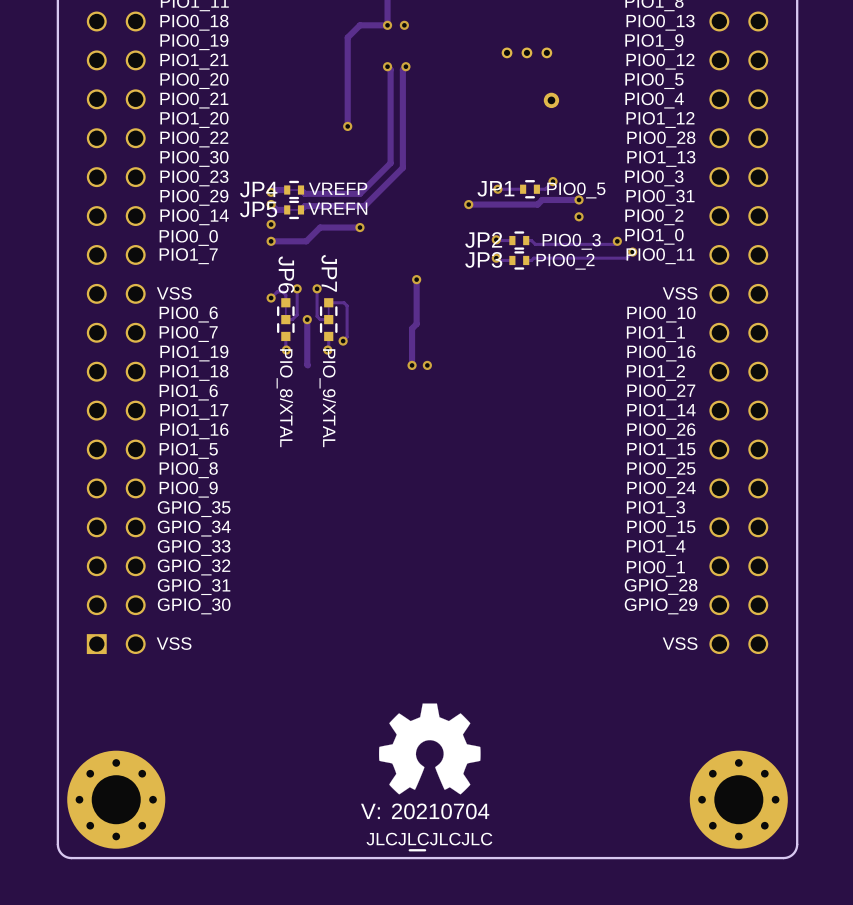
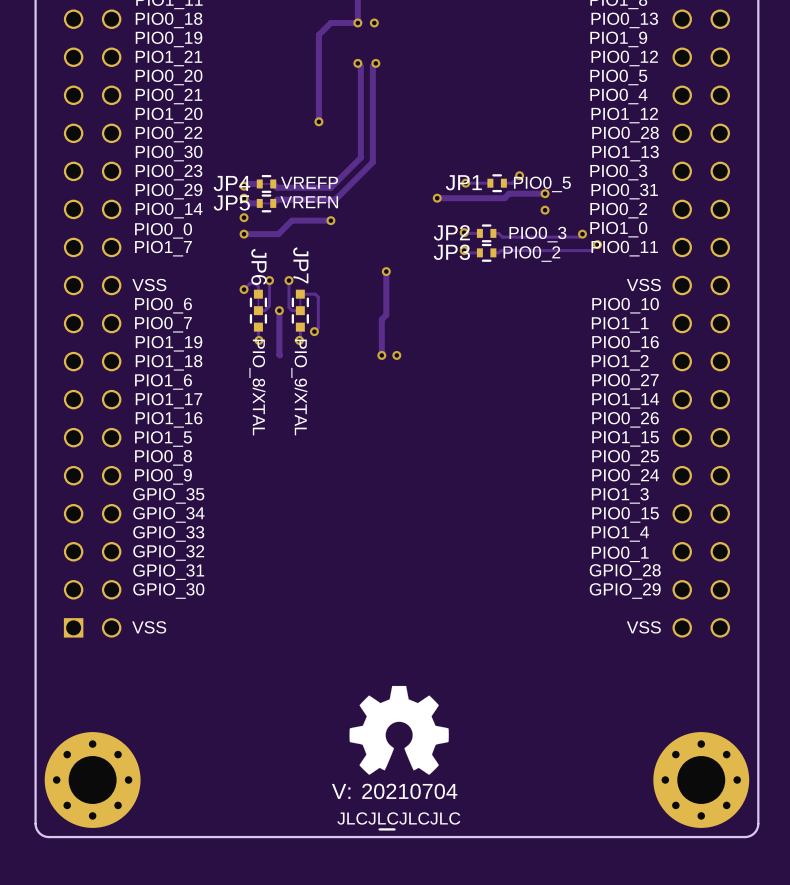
part: (507, 52) -> none
part: (526, 52) -> none
part: (546, 52) -> none
part: (551, 100) -> none

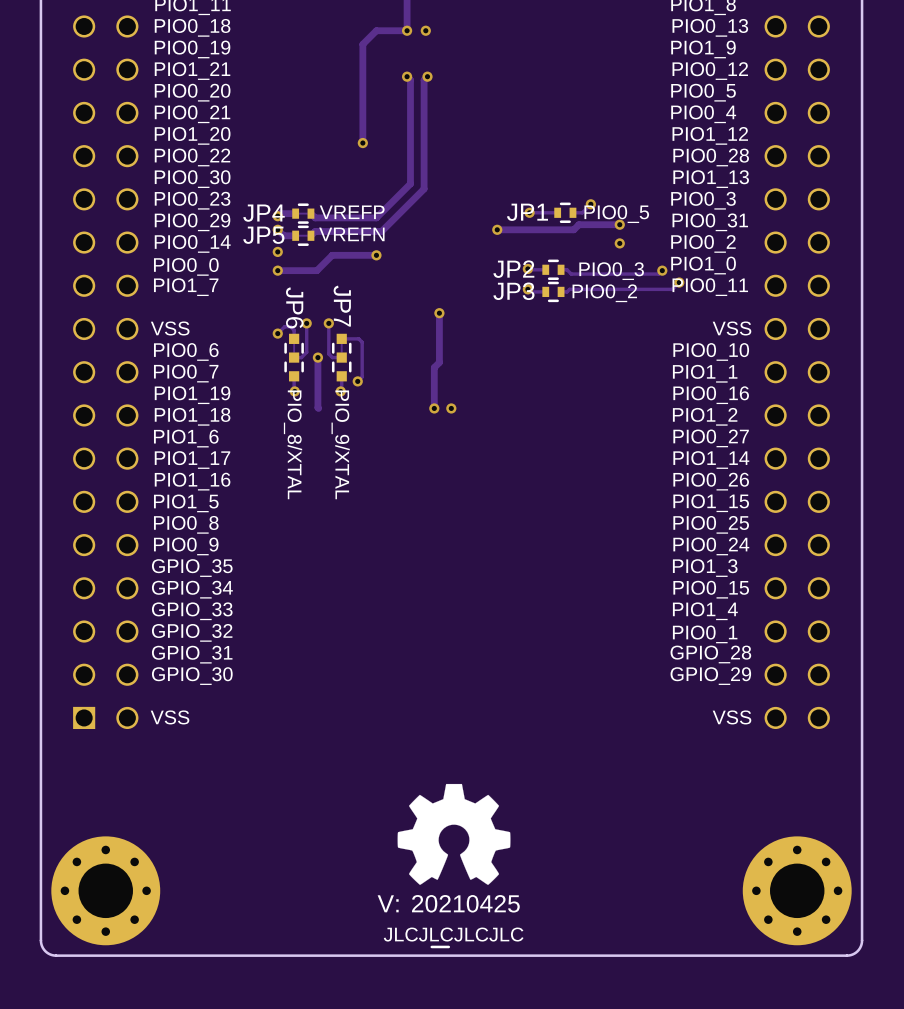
drawing shape: [331, 783, 458, 800] -> [377, 895, 520, 913]

